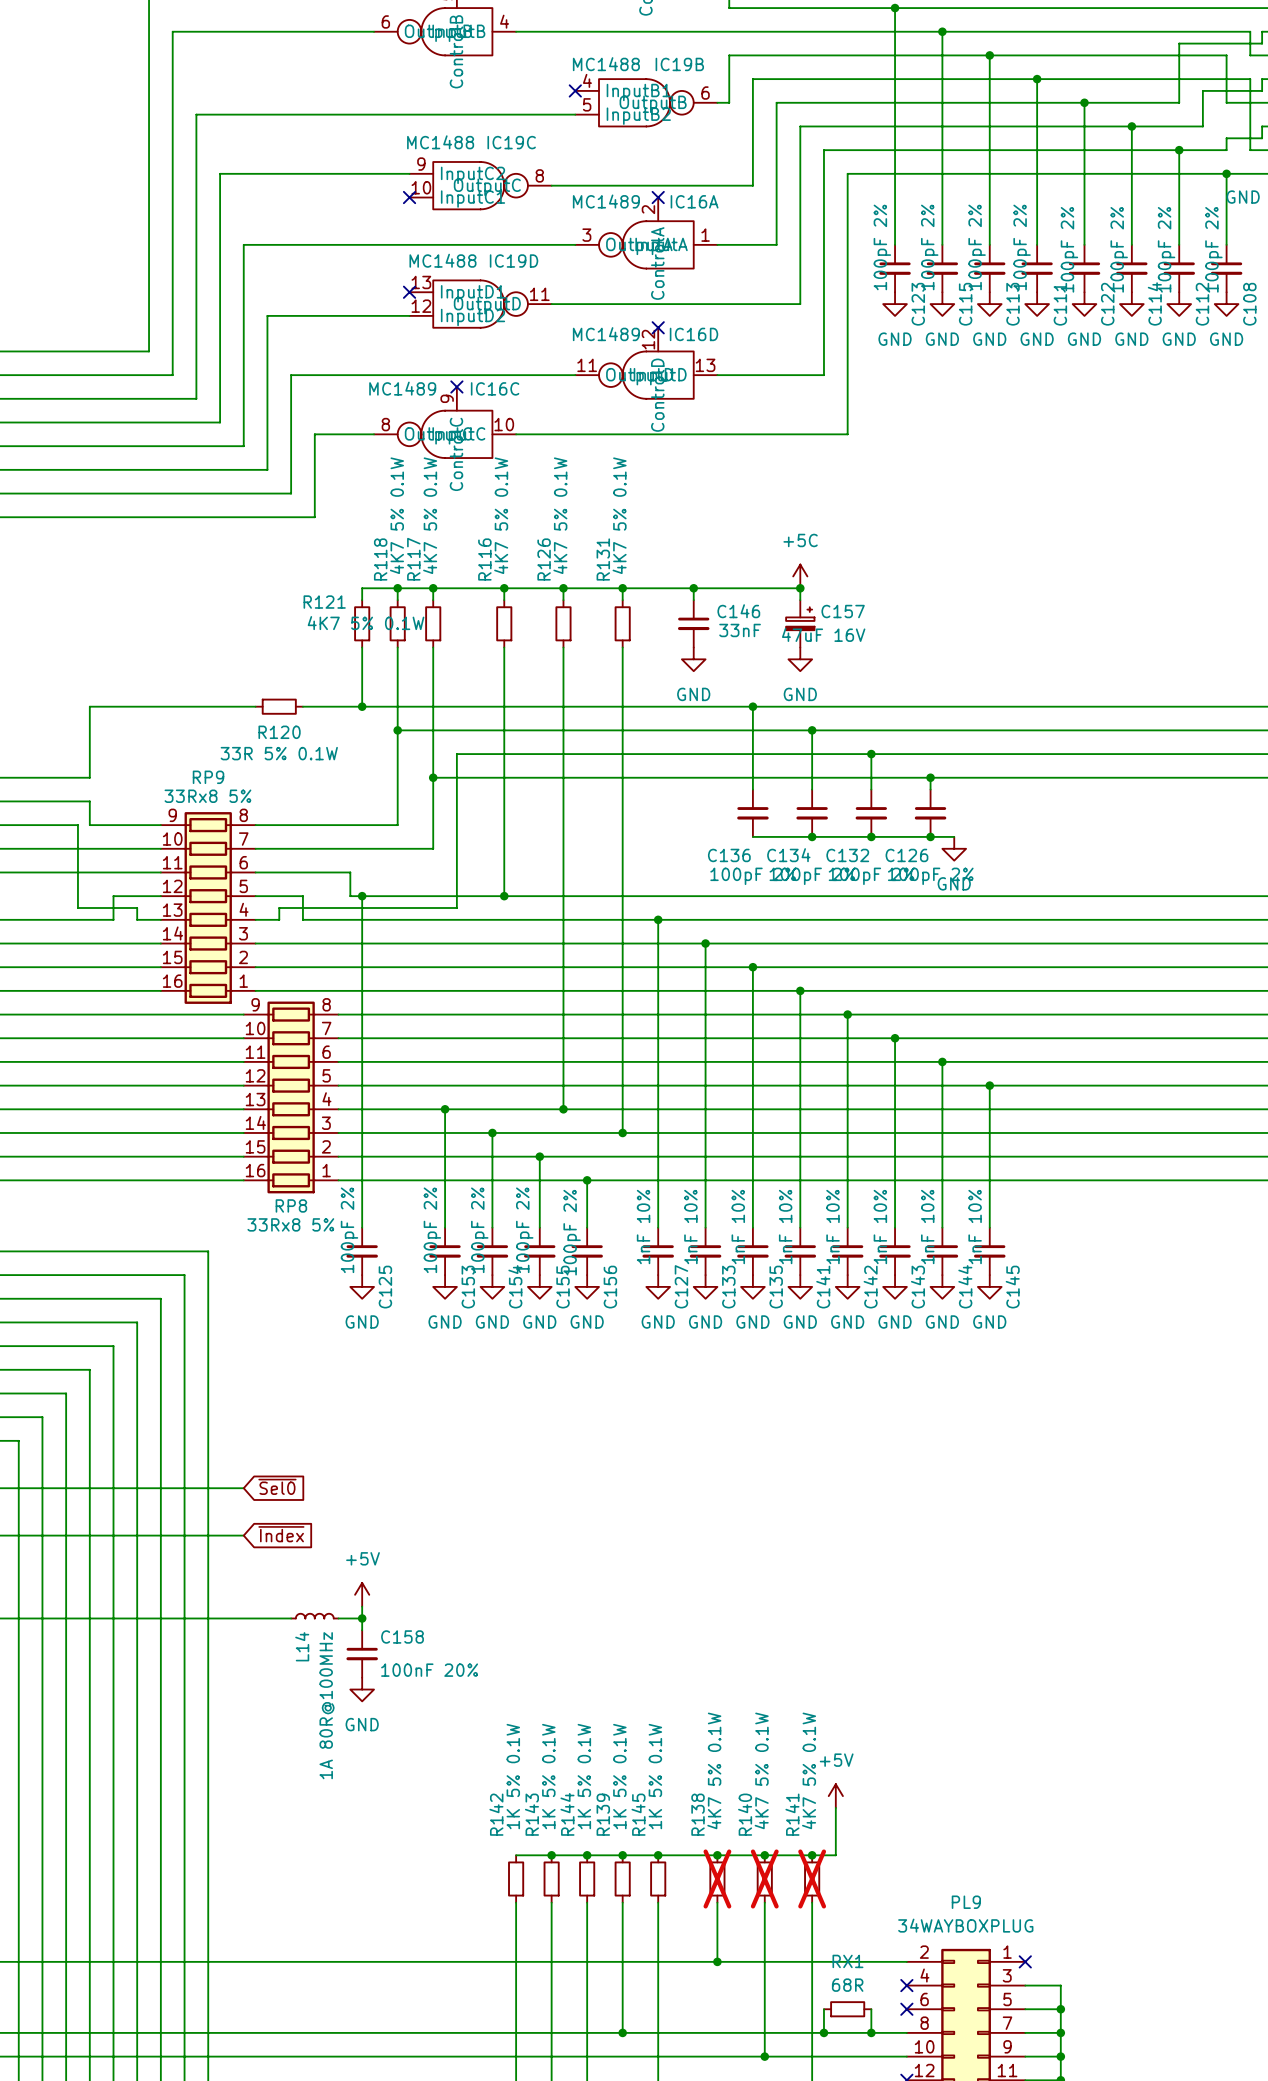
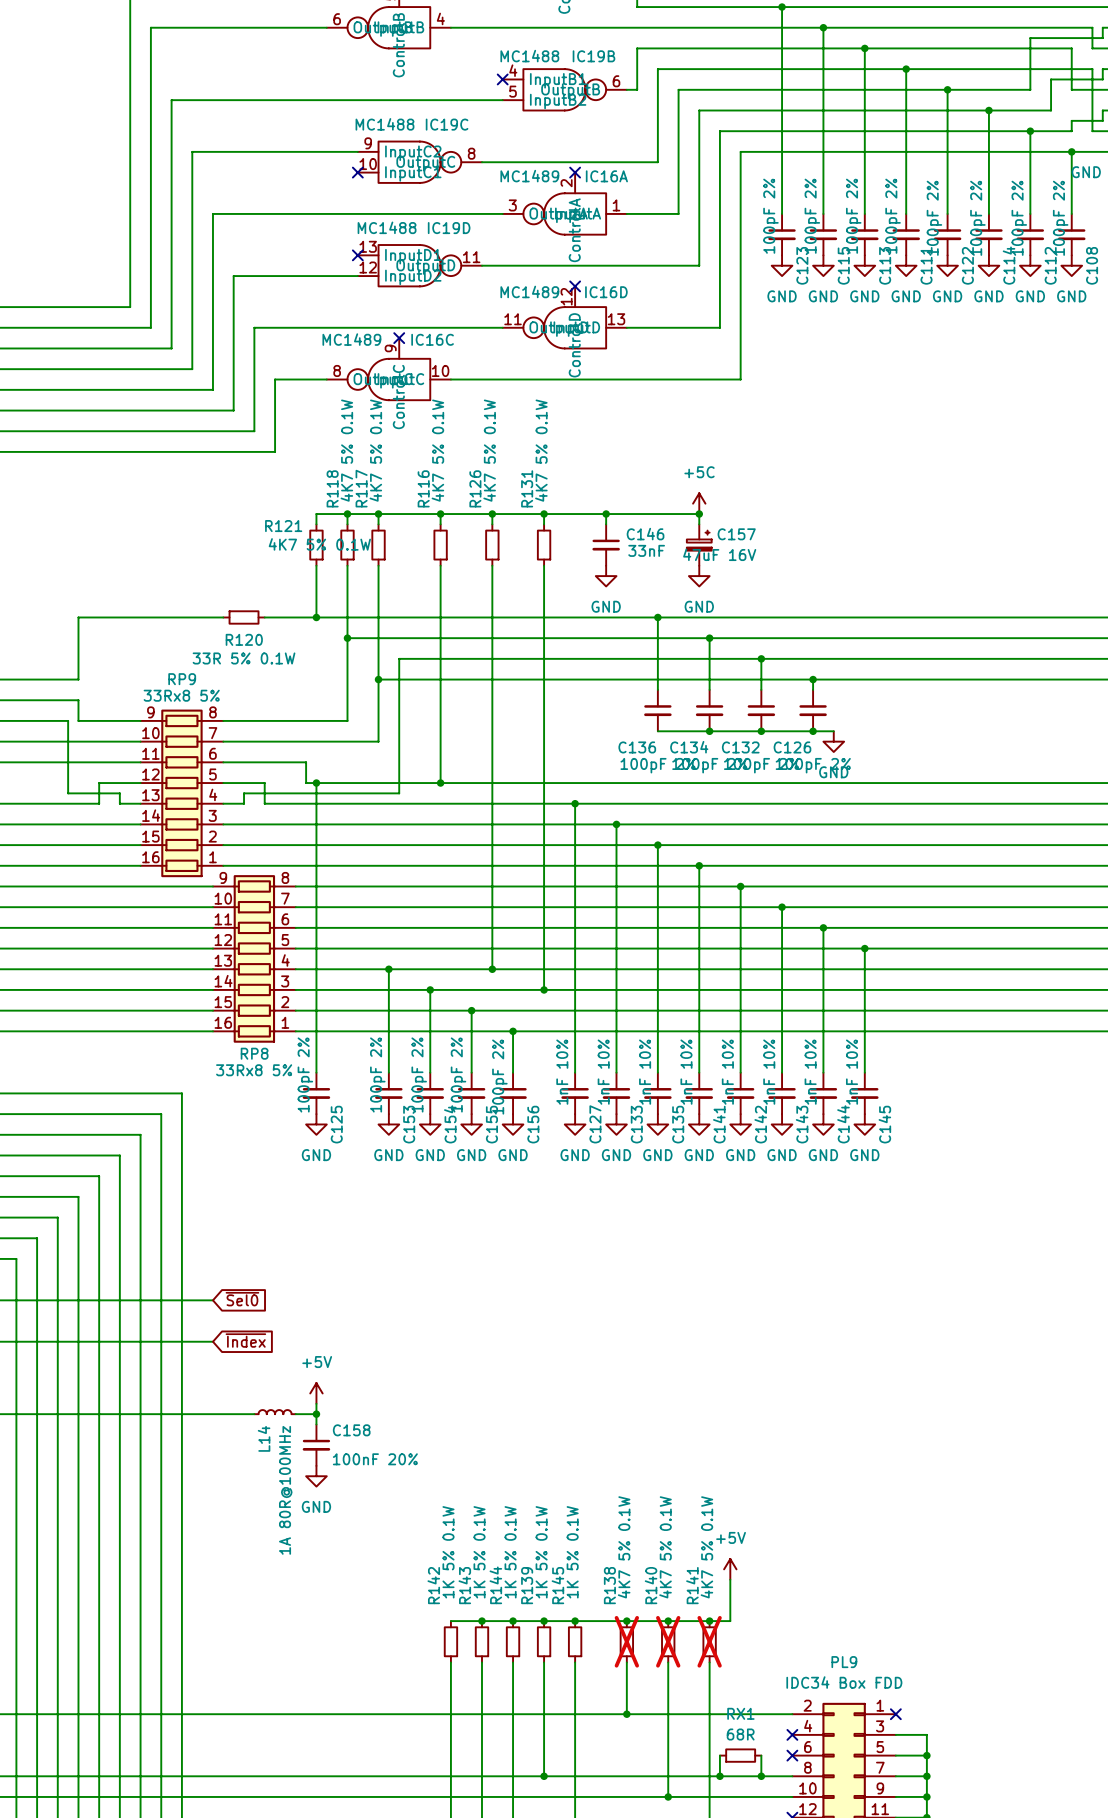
PL9 value: 34WAYBOXPLUG (965, 1925) -> IDC34 Box FDD (844, 1682)

